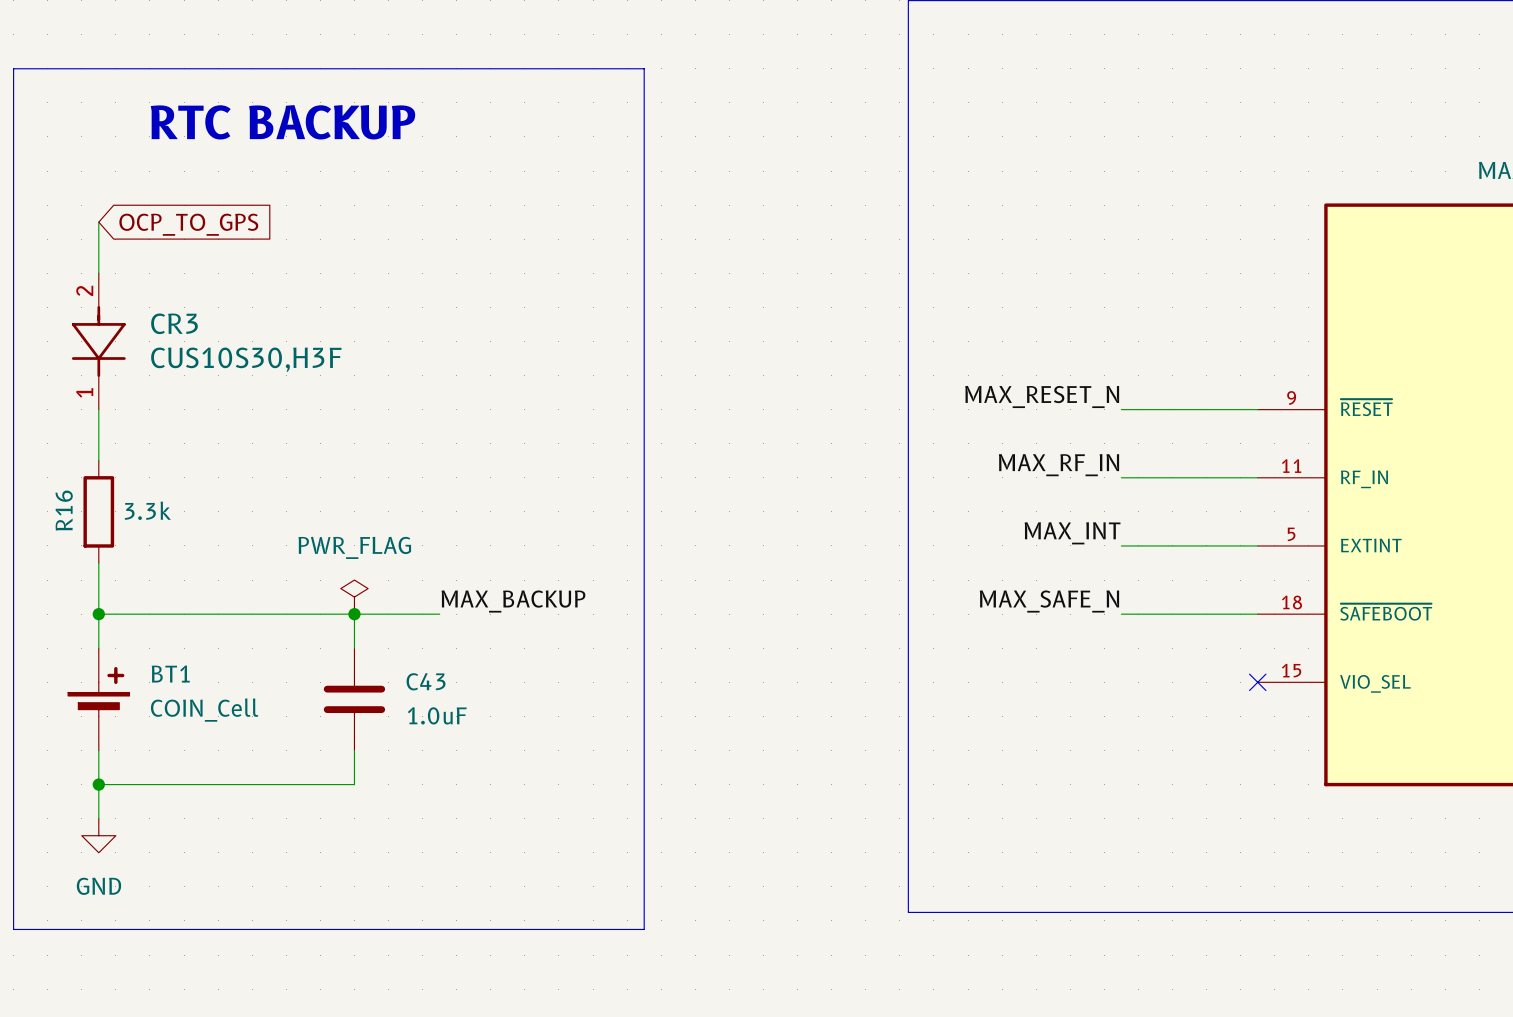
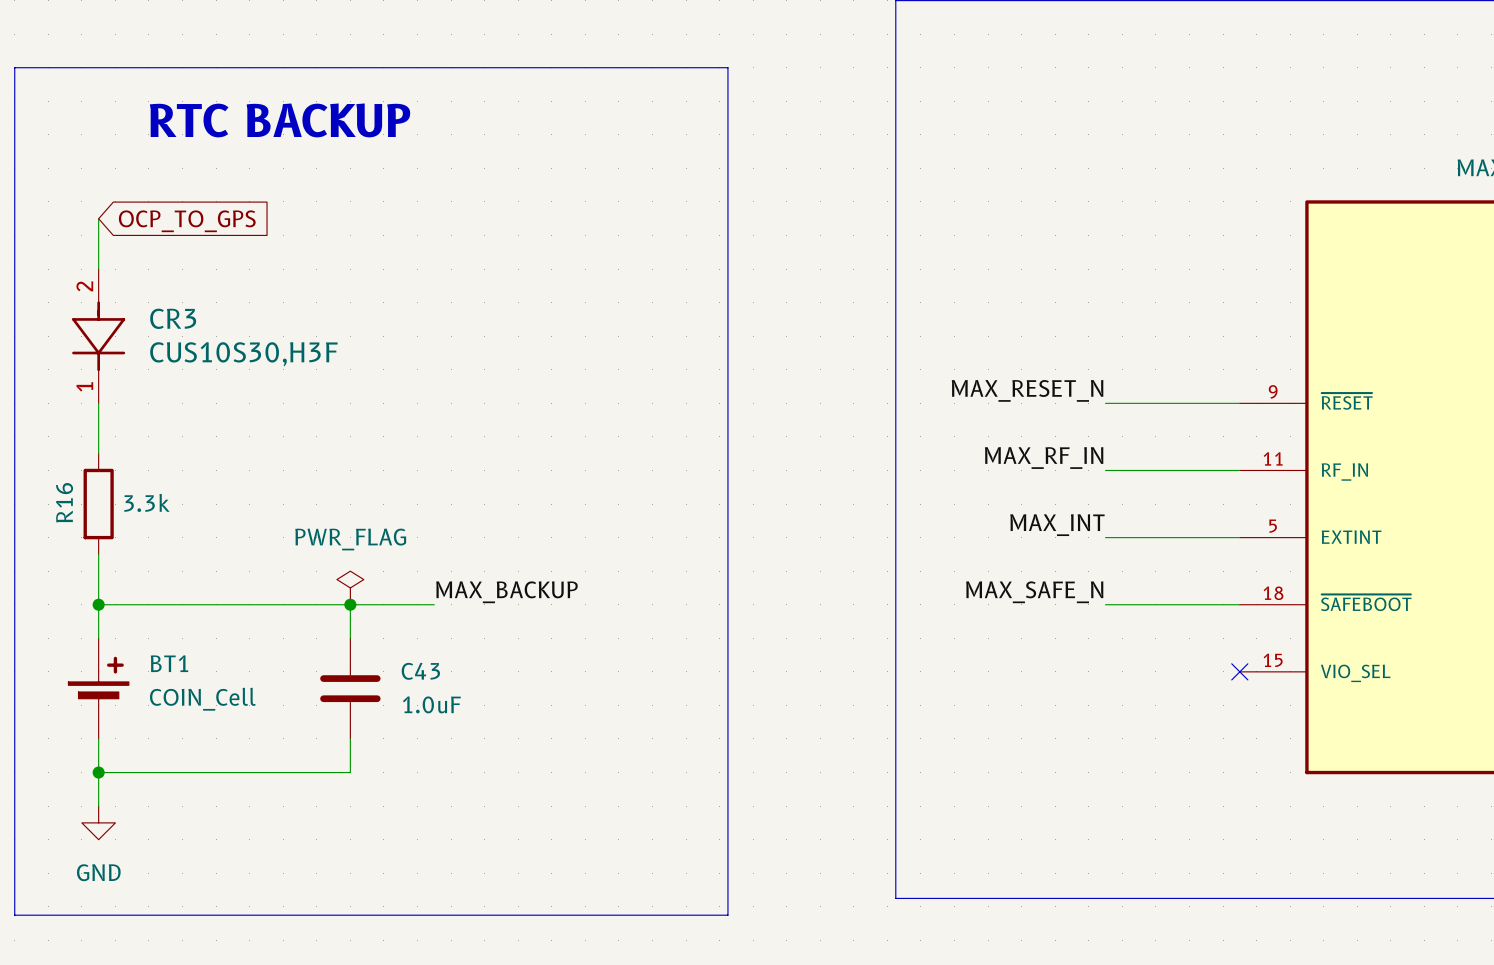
line: (644, 68) (644, 929) -> (635, 67) (727, 67) (727, 915) (635, 915)

